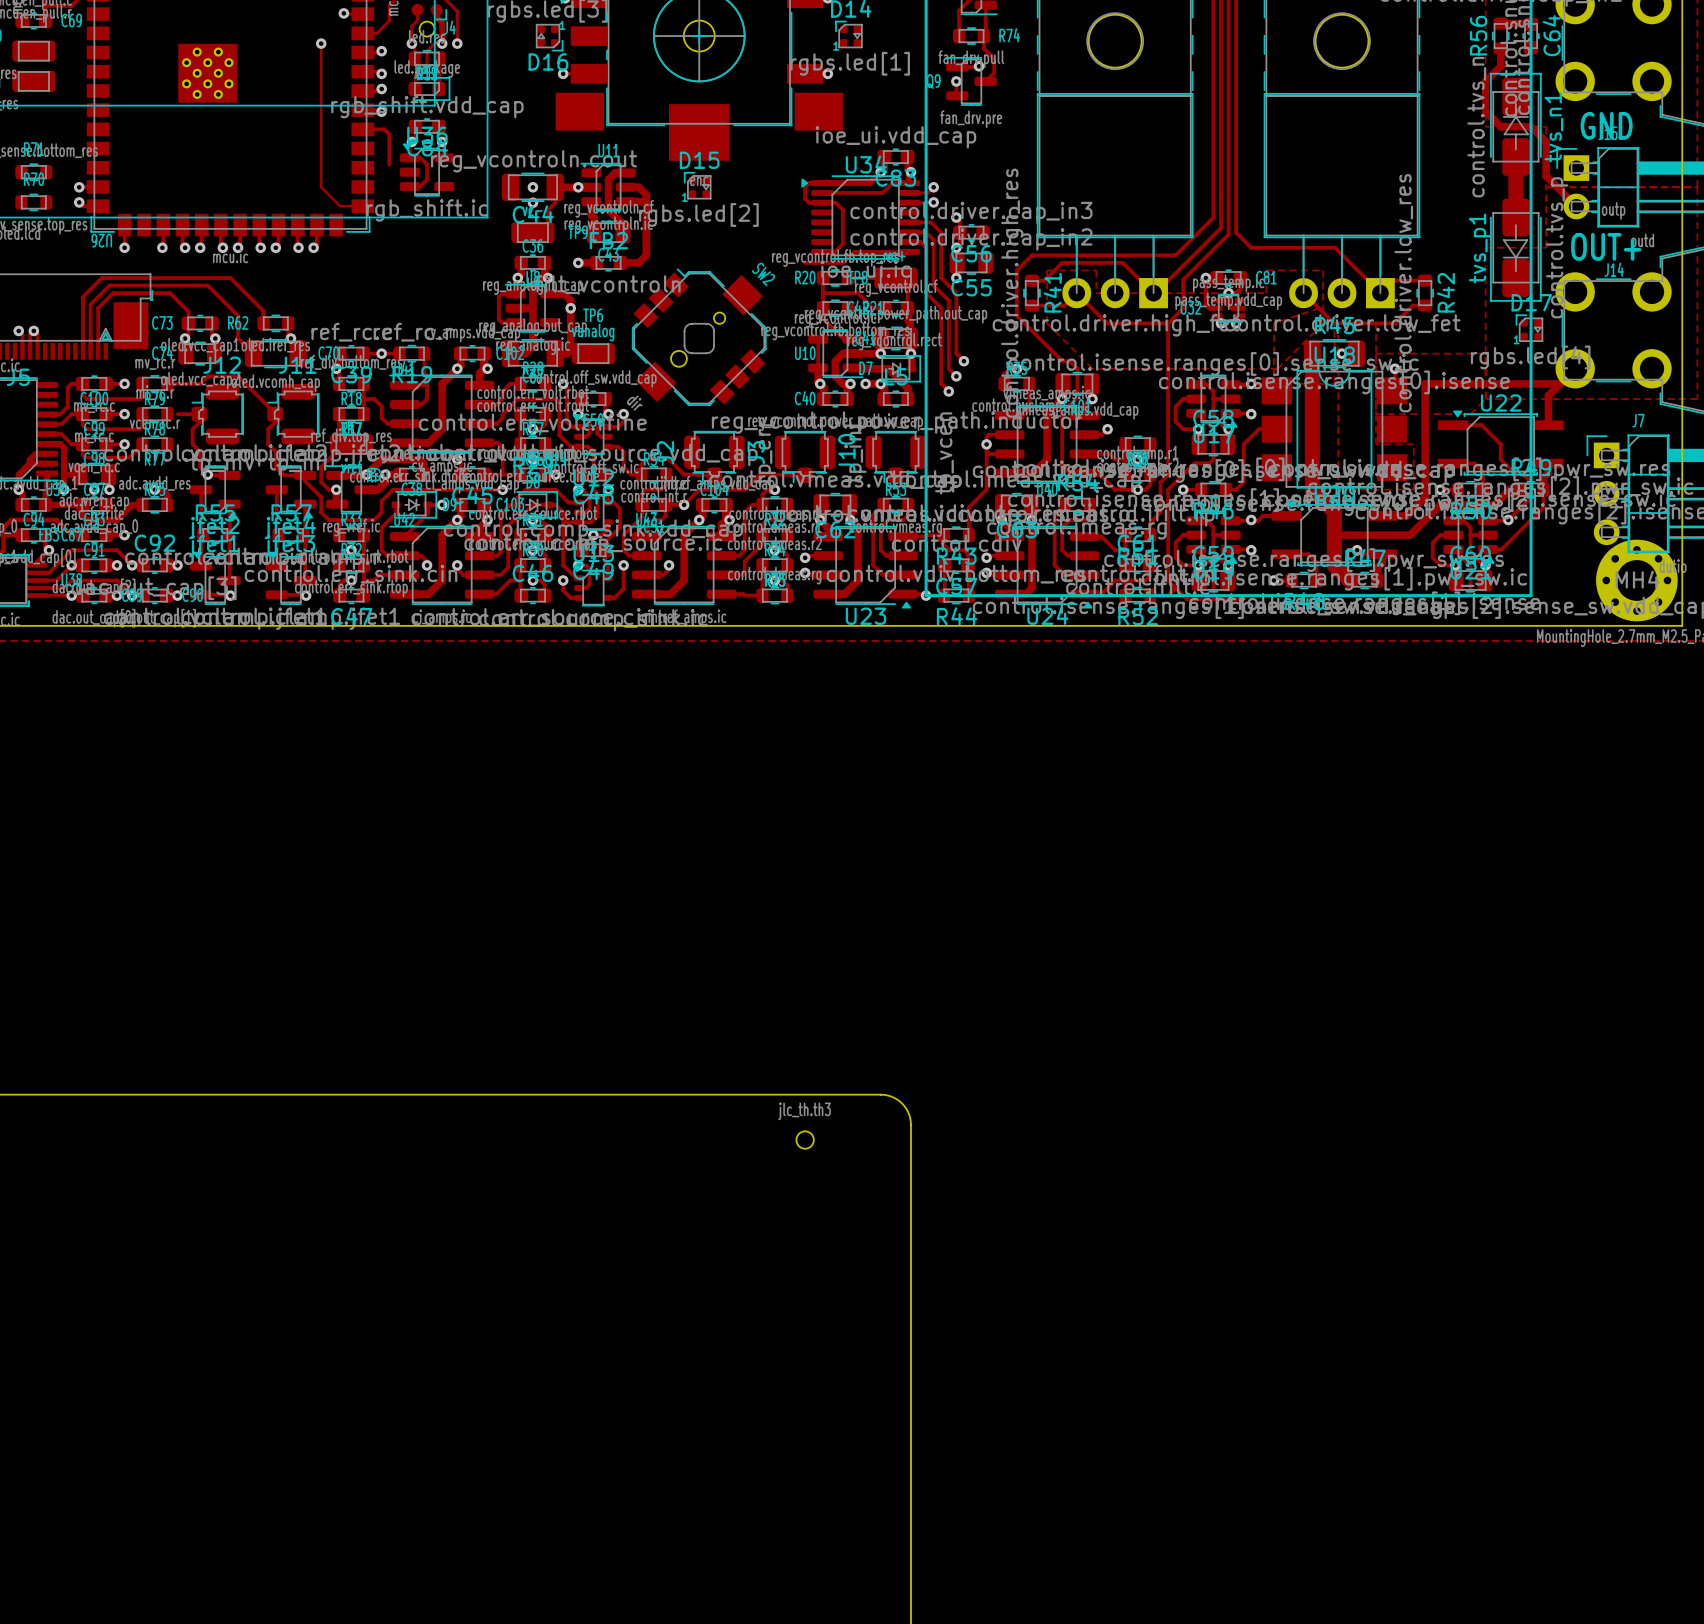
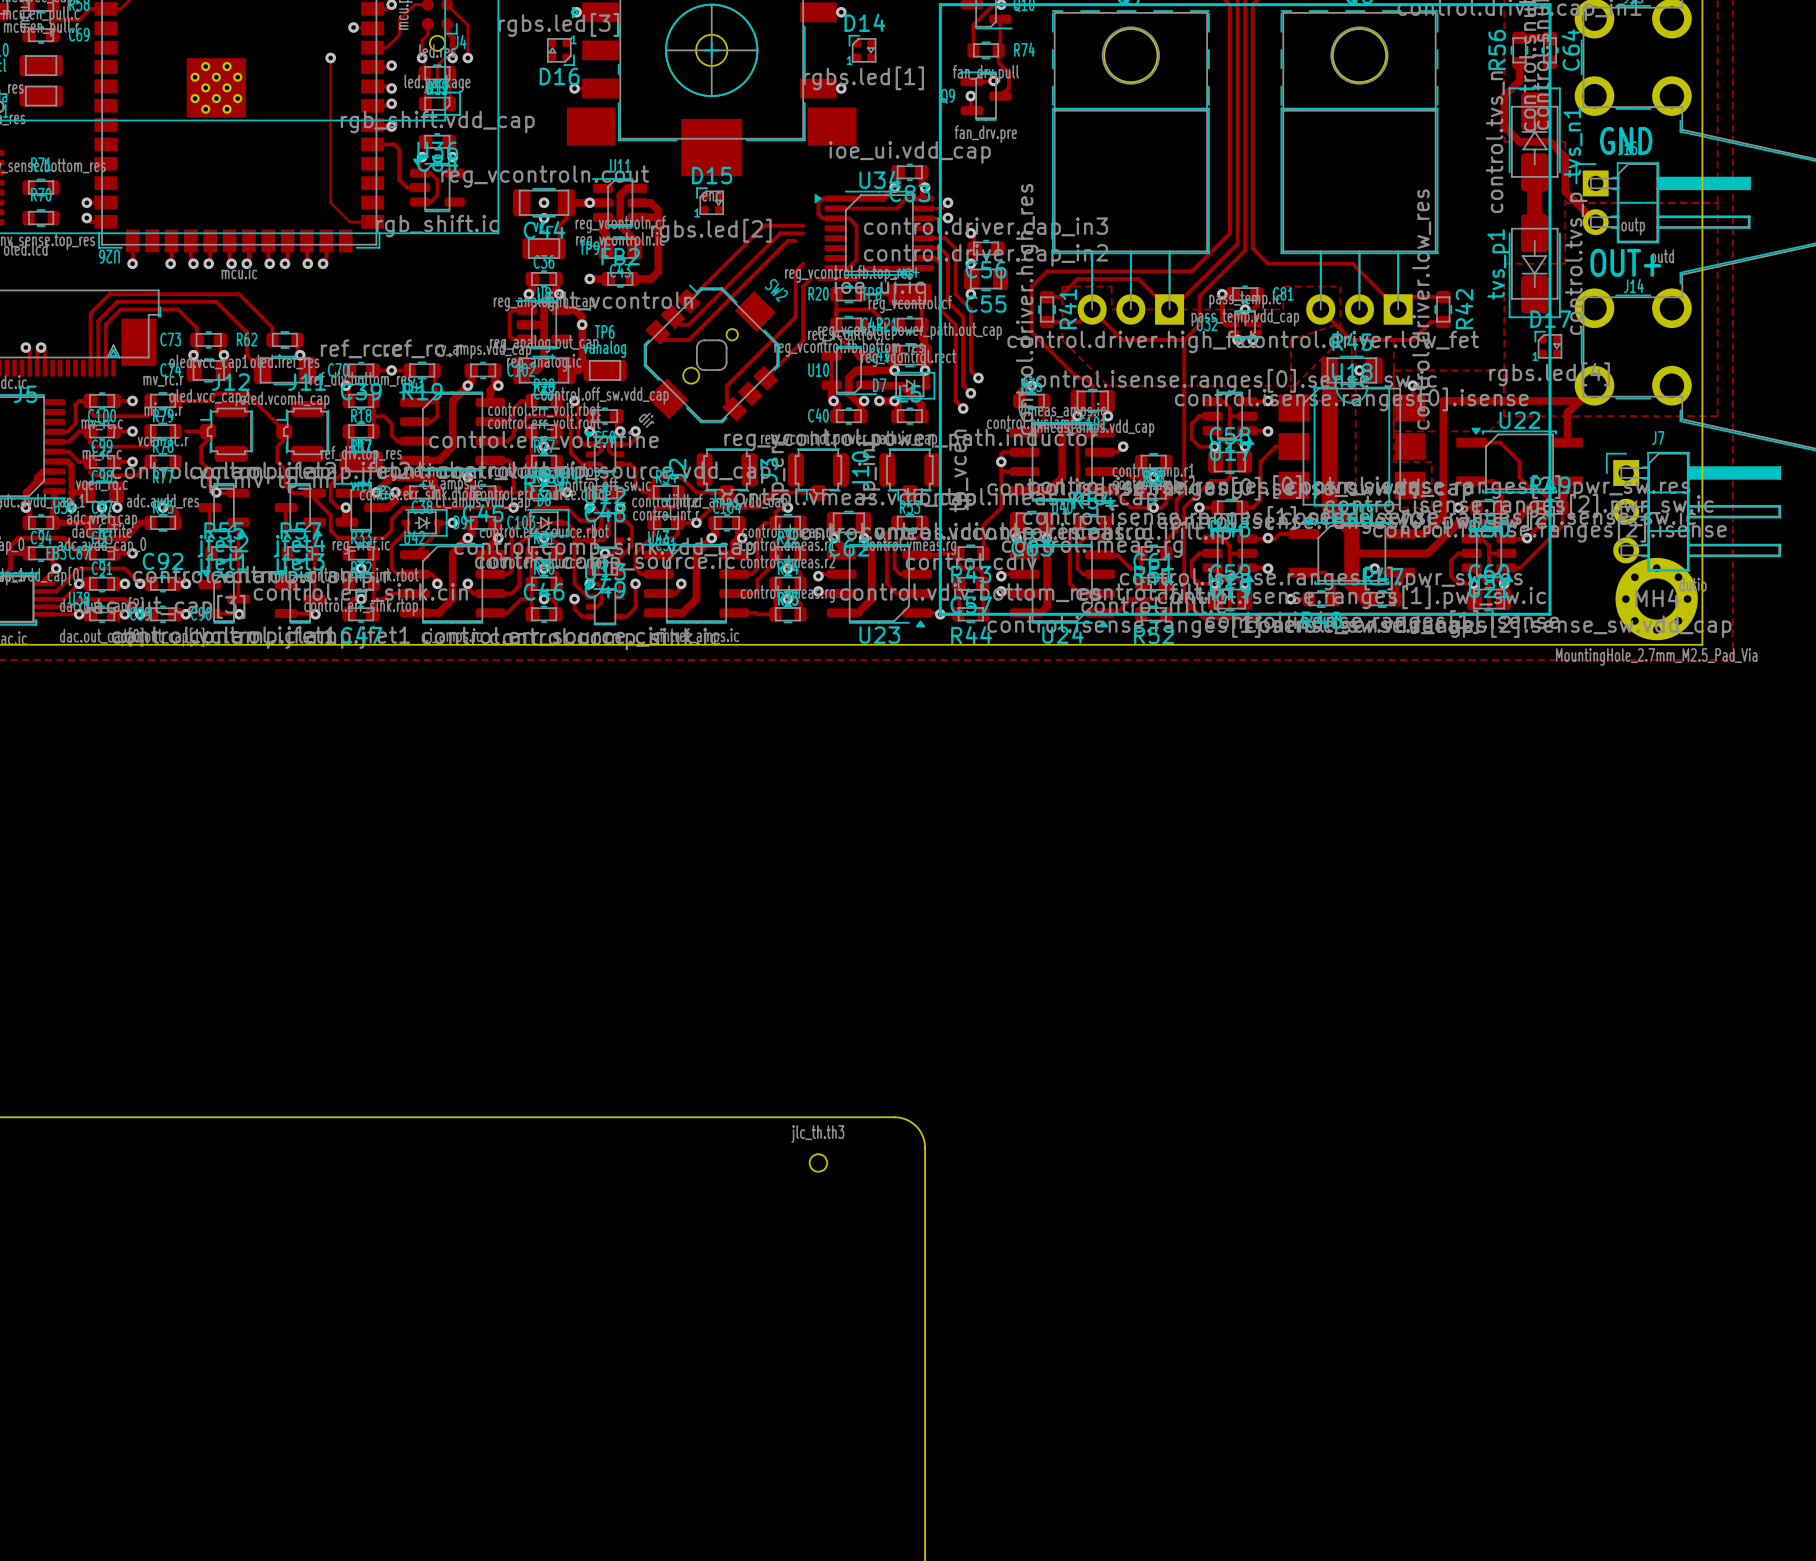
track: none -> (399, 179) (406, 187) (420, 187)
track: none -> (803, 225) (764, 225) (688, 301)
track: none -> (803, 233) (780, 233) (688, 324) (681, 324) (673, 316)
track: none -> (795, 240) (787, 240) (688, 339) (665, 339) (657, 332)
track: none -> (803, 263) (795, 271) (795, 317) (726, 385) (726, 401) (734, 409)
track: none -> (810, 278) (803, 286) (803, 340) (765, 378)

